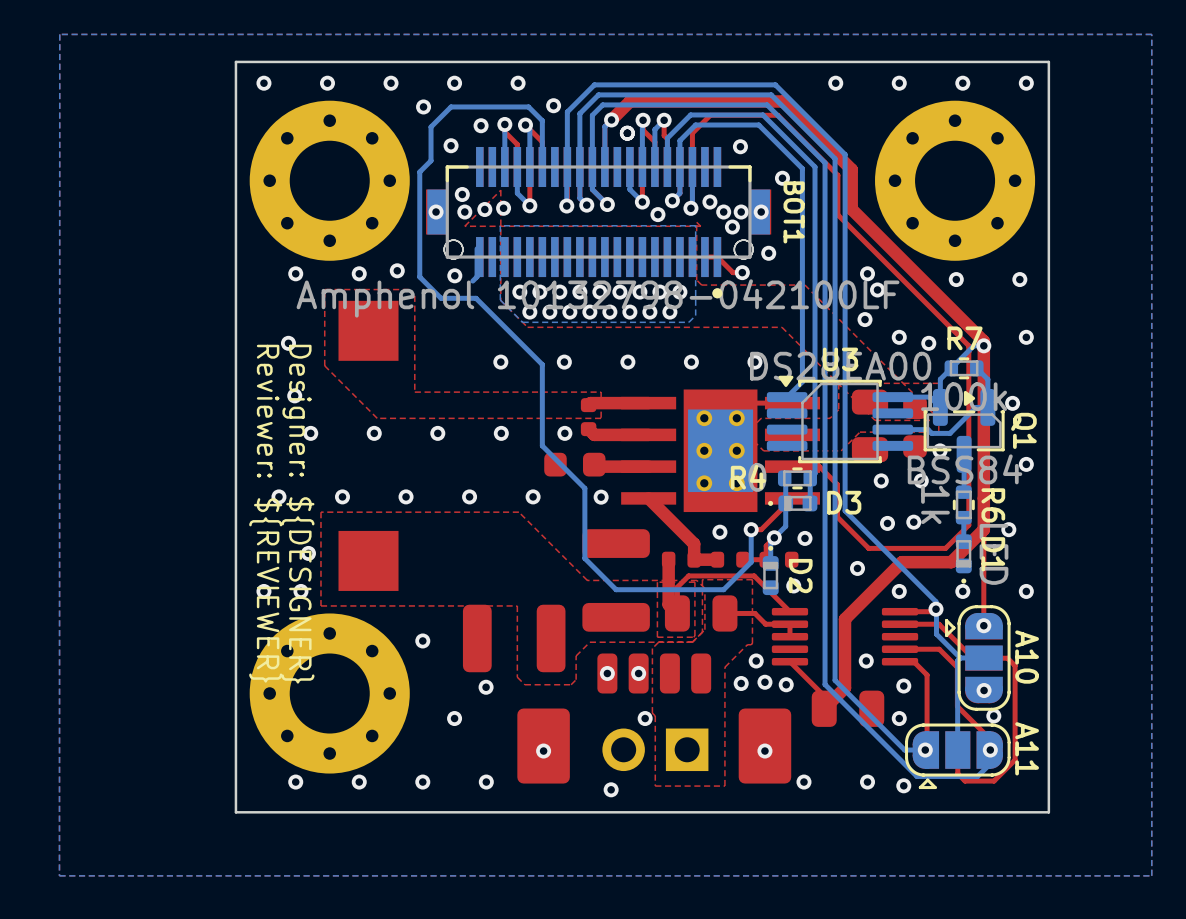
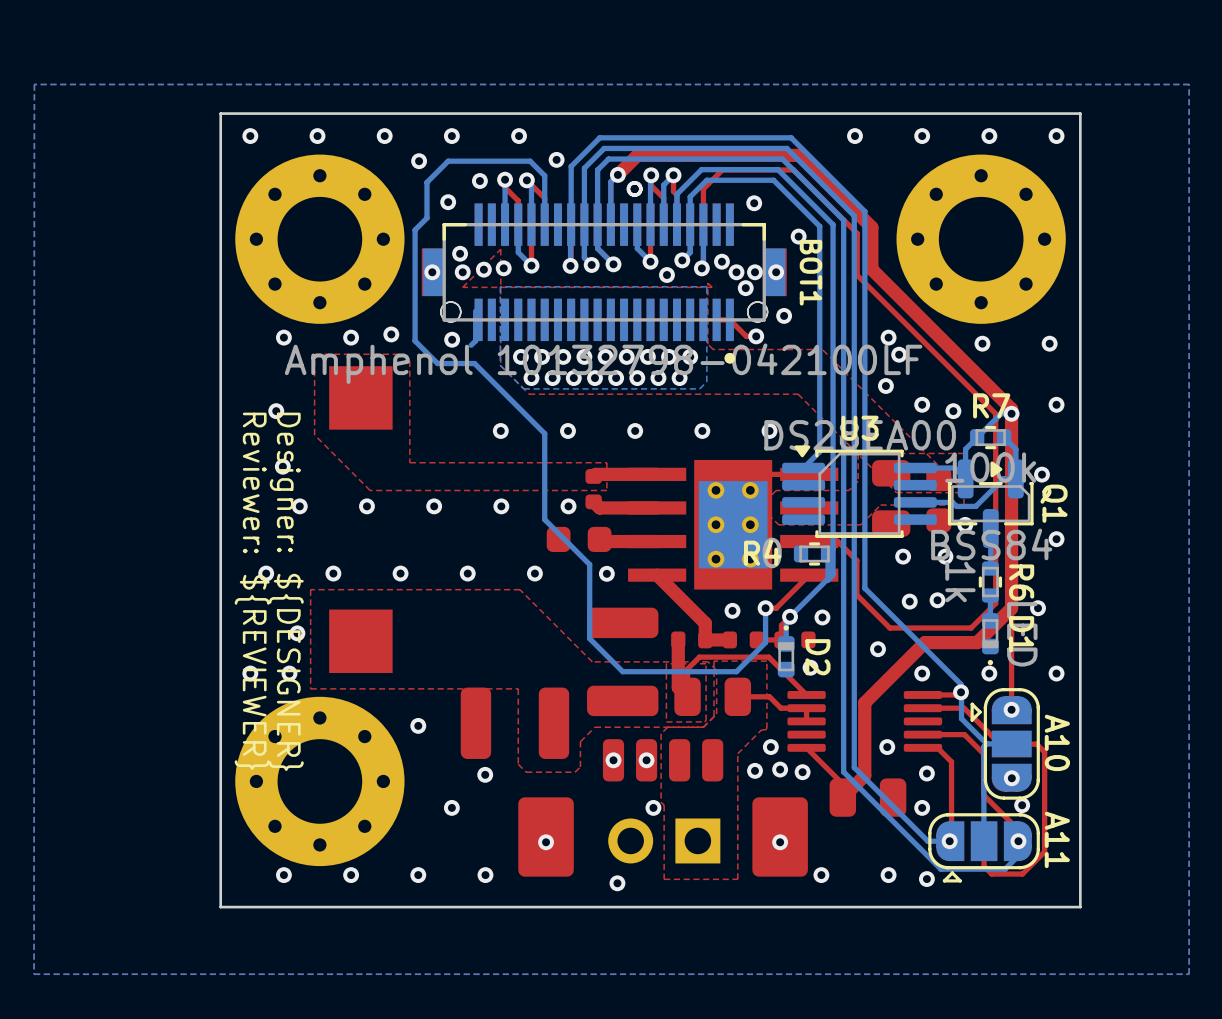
bottom track: (784, 478) (785, 526) -> (833, 548) (833, 573) (802, 604)
D3: (792, 503) -> none

